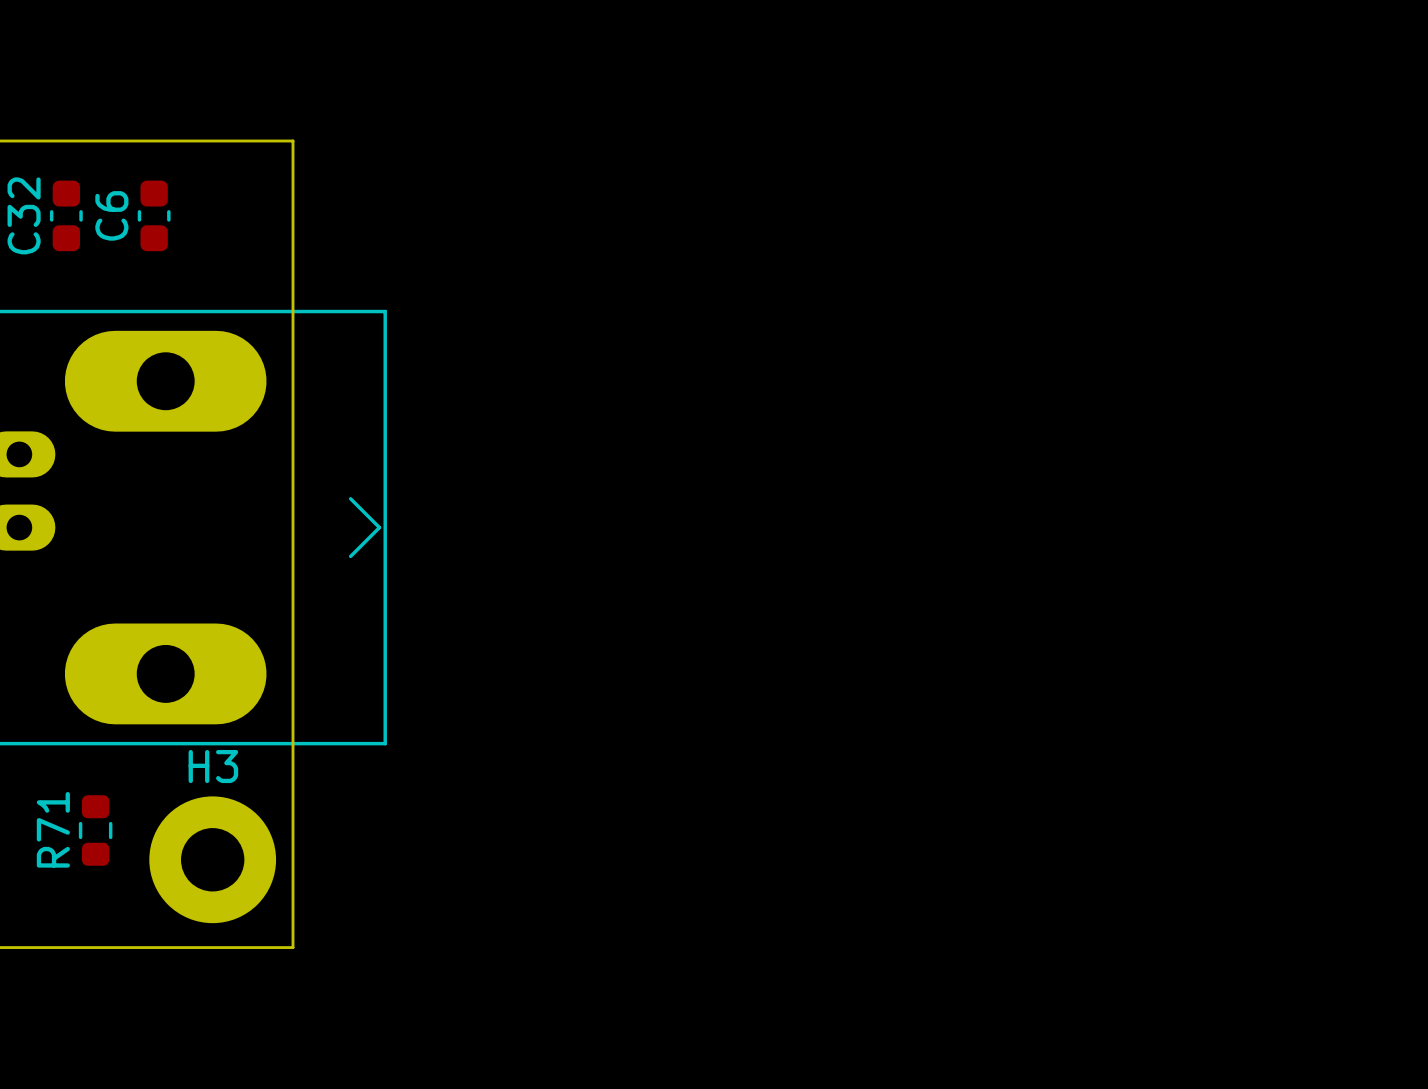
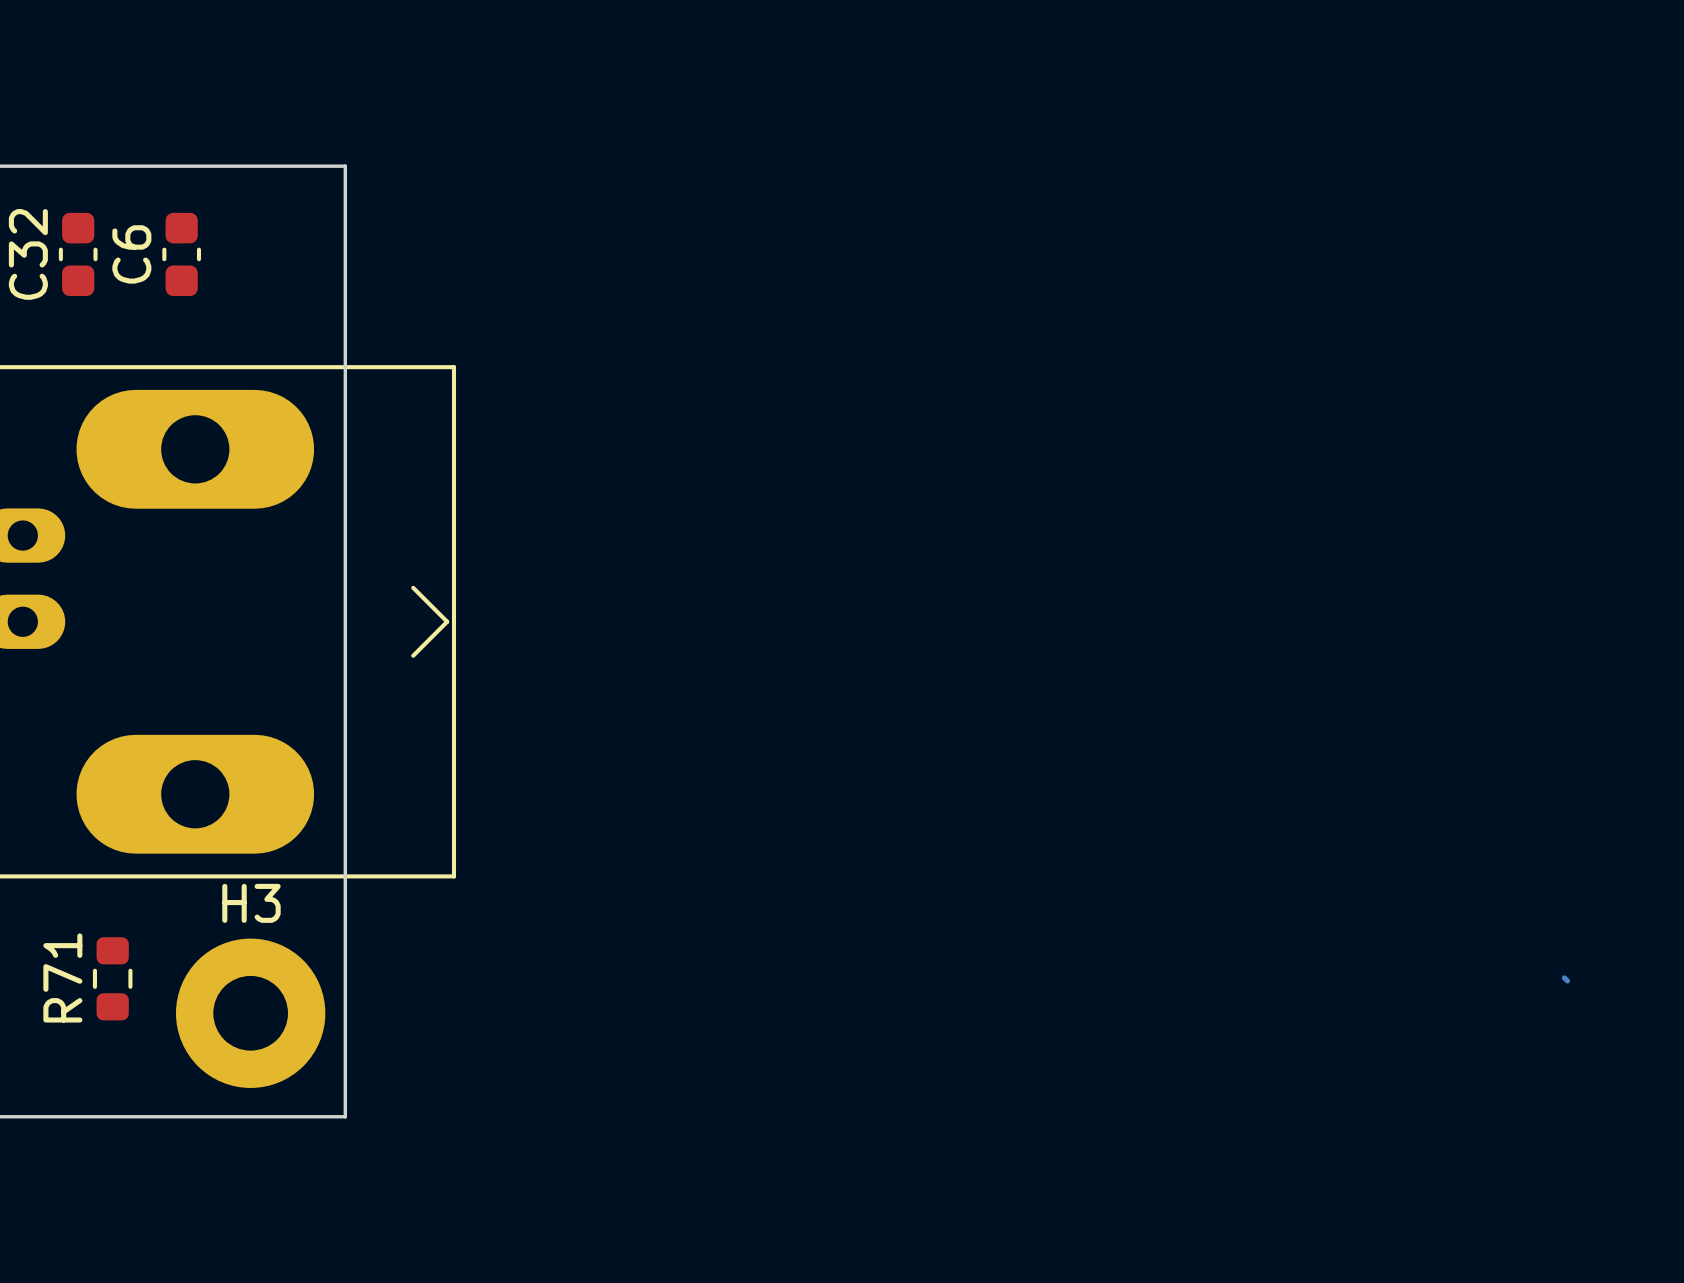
bottom track: none -> (1564, 977) (1567, 980)

